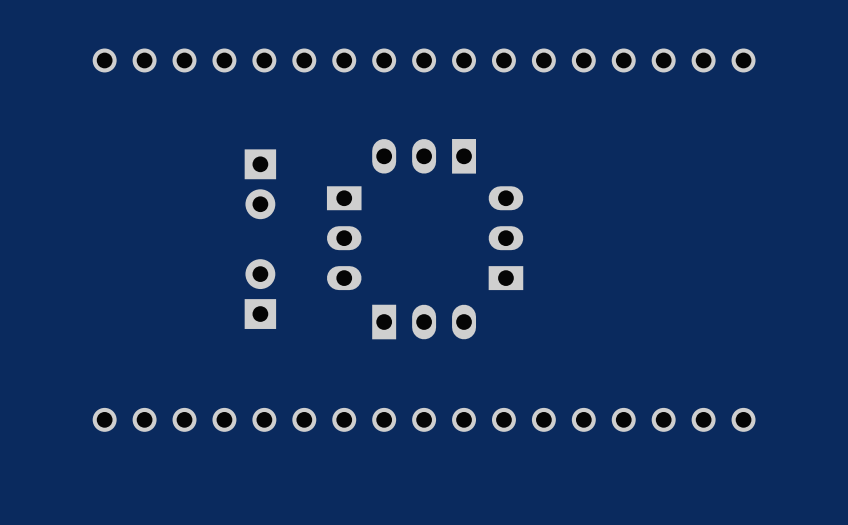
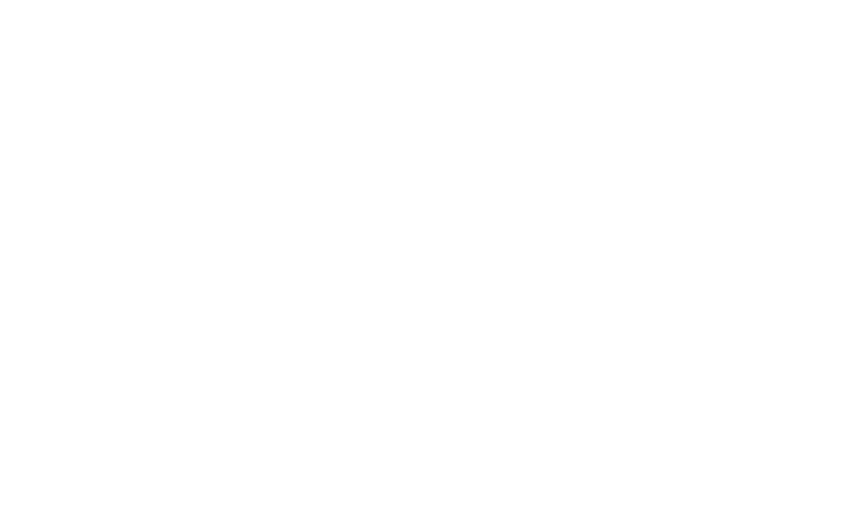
part: (424, 60) -> none
part: (424, 156) -> none
part: (260, 184) -> none
part: (344, 238) -> none
part: (505, 238) -> none
part: (260, 294) -> none
part: (424, 322) -> none
part: (424, 419) -> none

